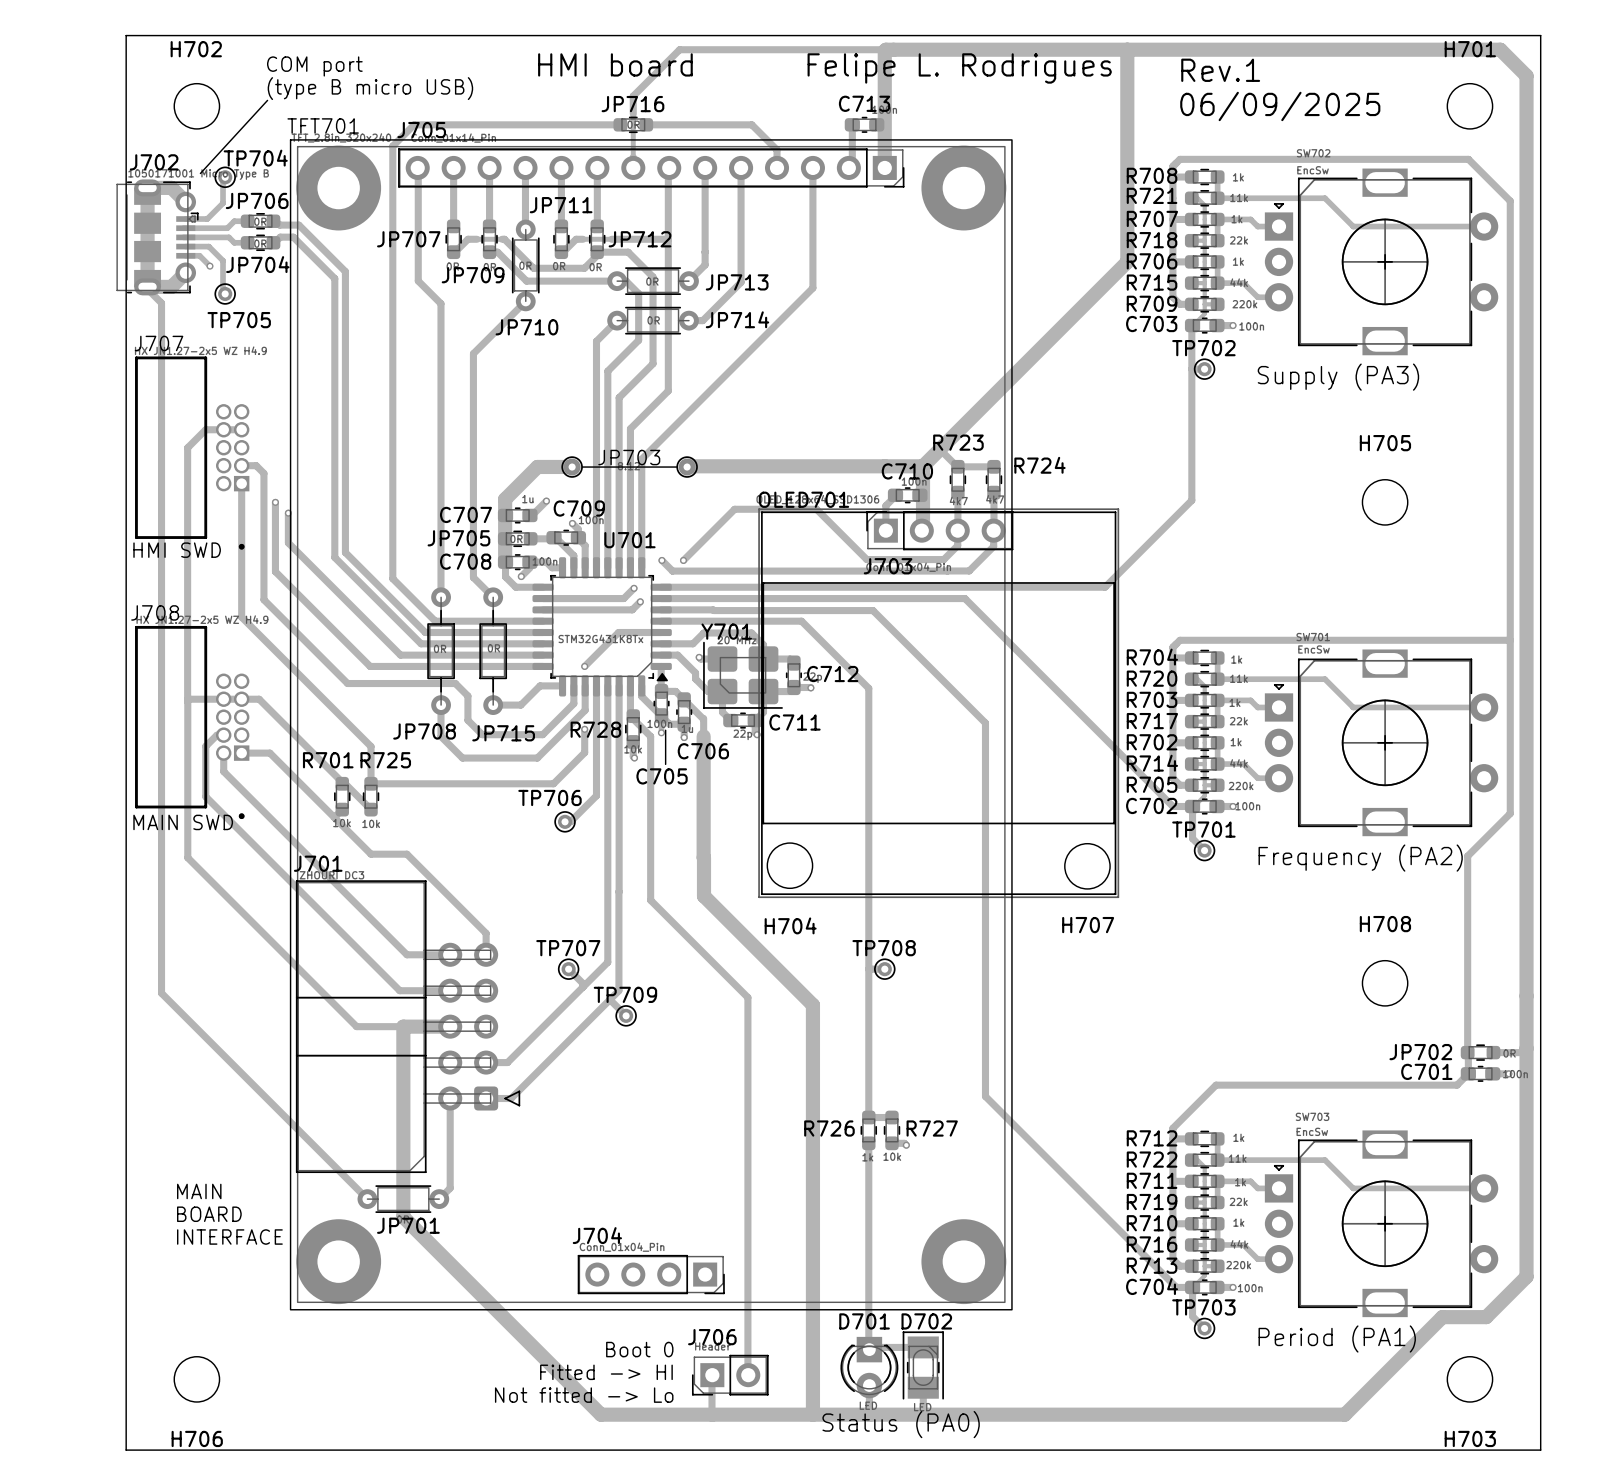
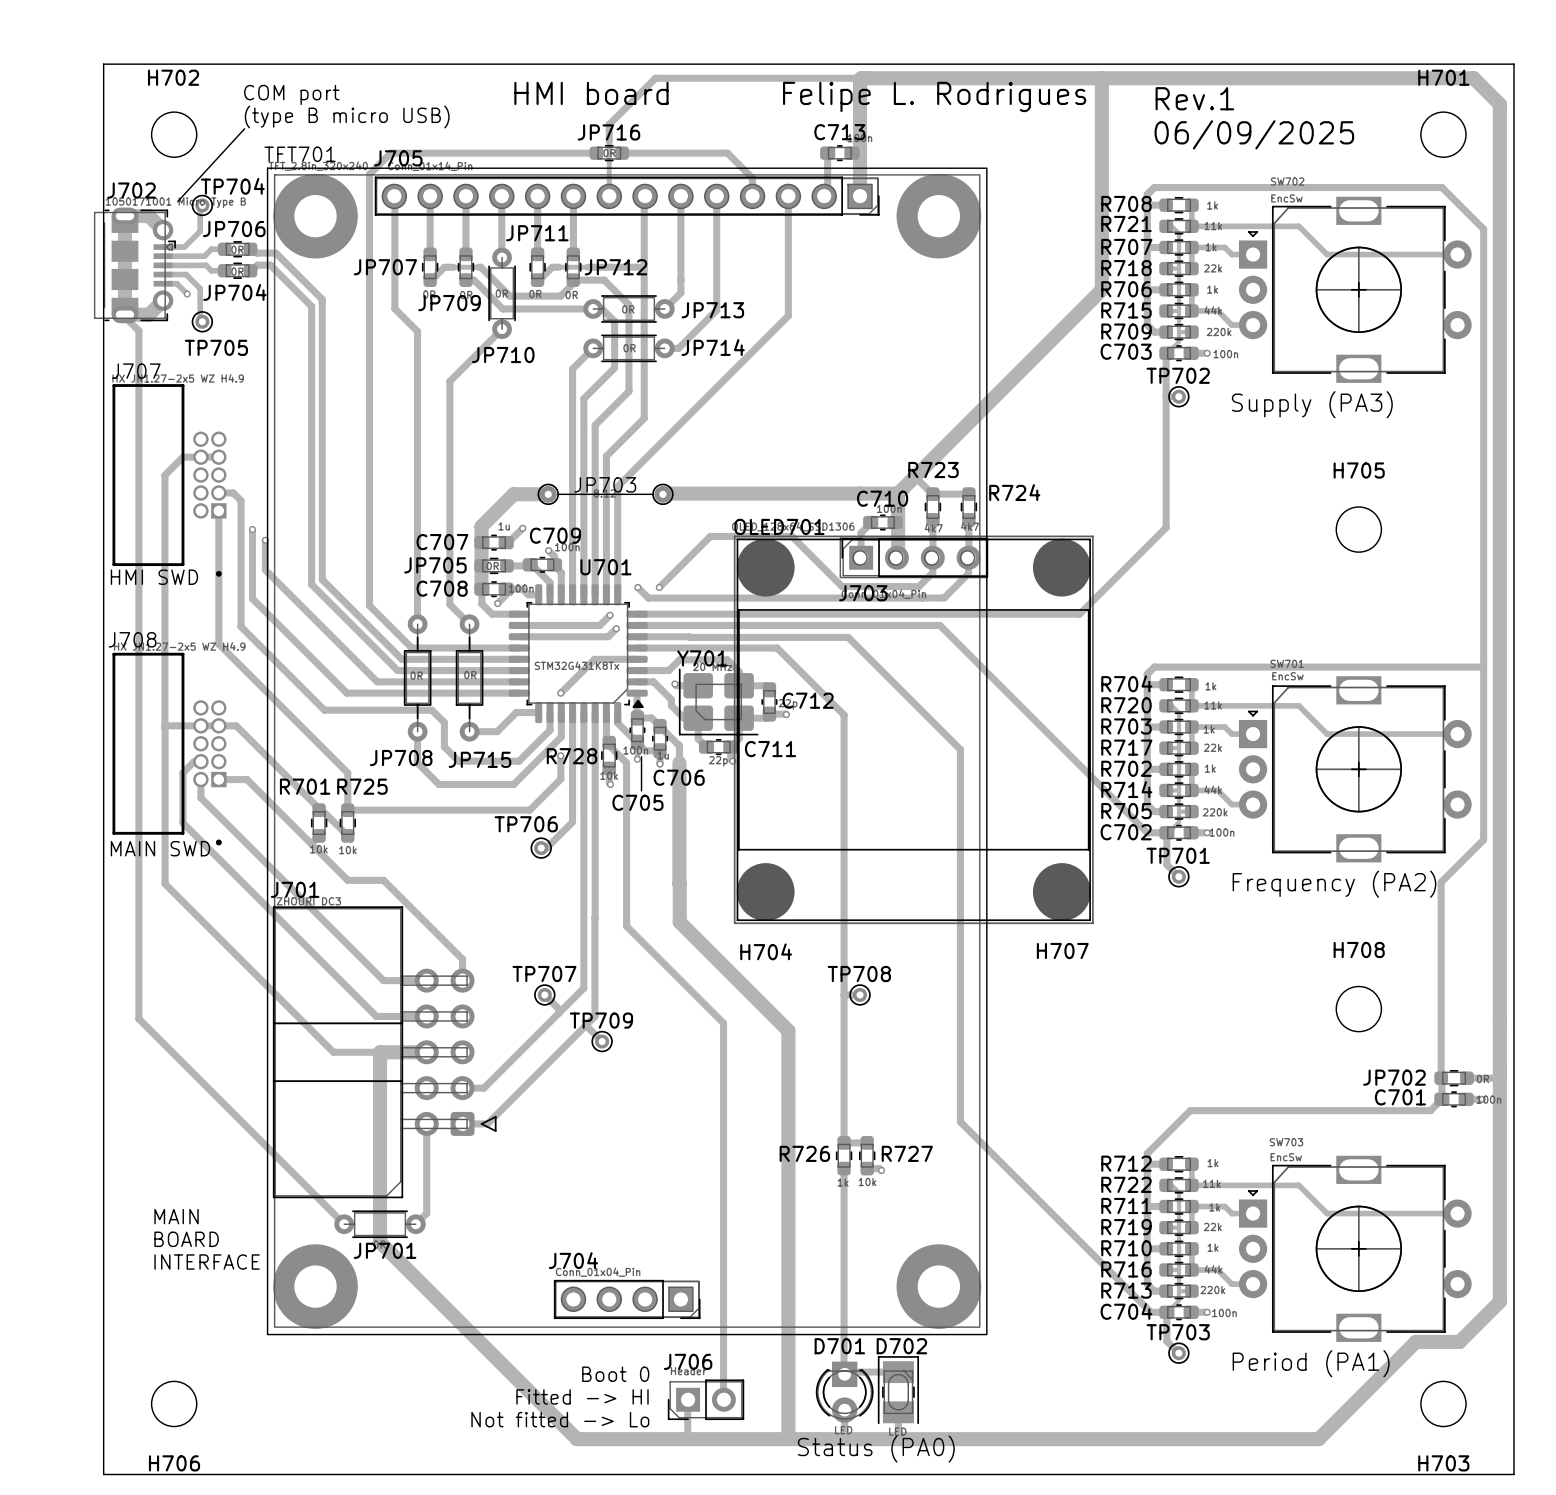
TFT701 footprint: [289, 139, 1013, 1311] -> [266, 167, 988, 1336]
OLED701 footprint: [758, 508, 1120, 899] -> [733, 535, 1094, 925]

